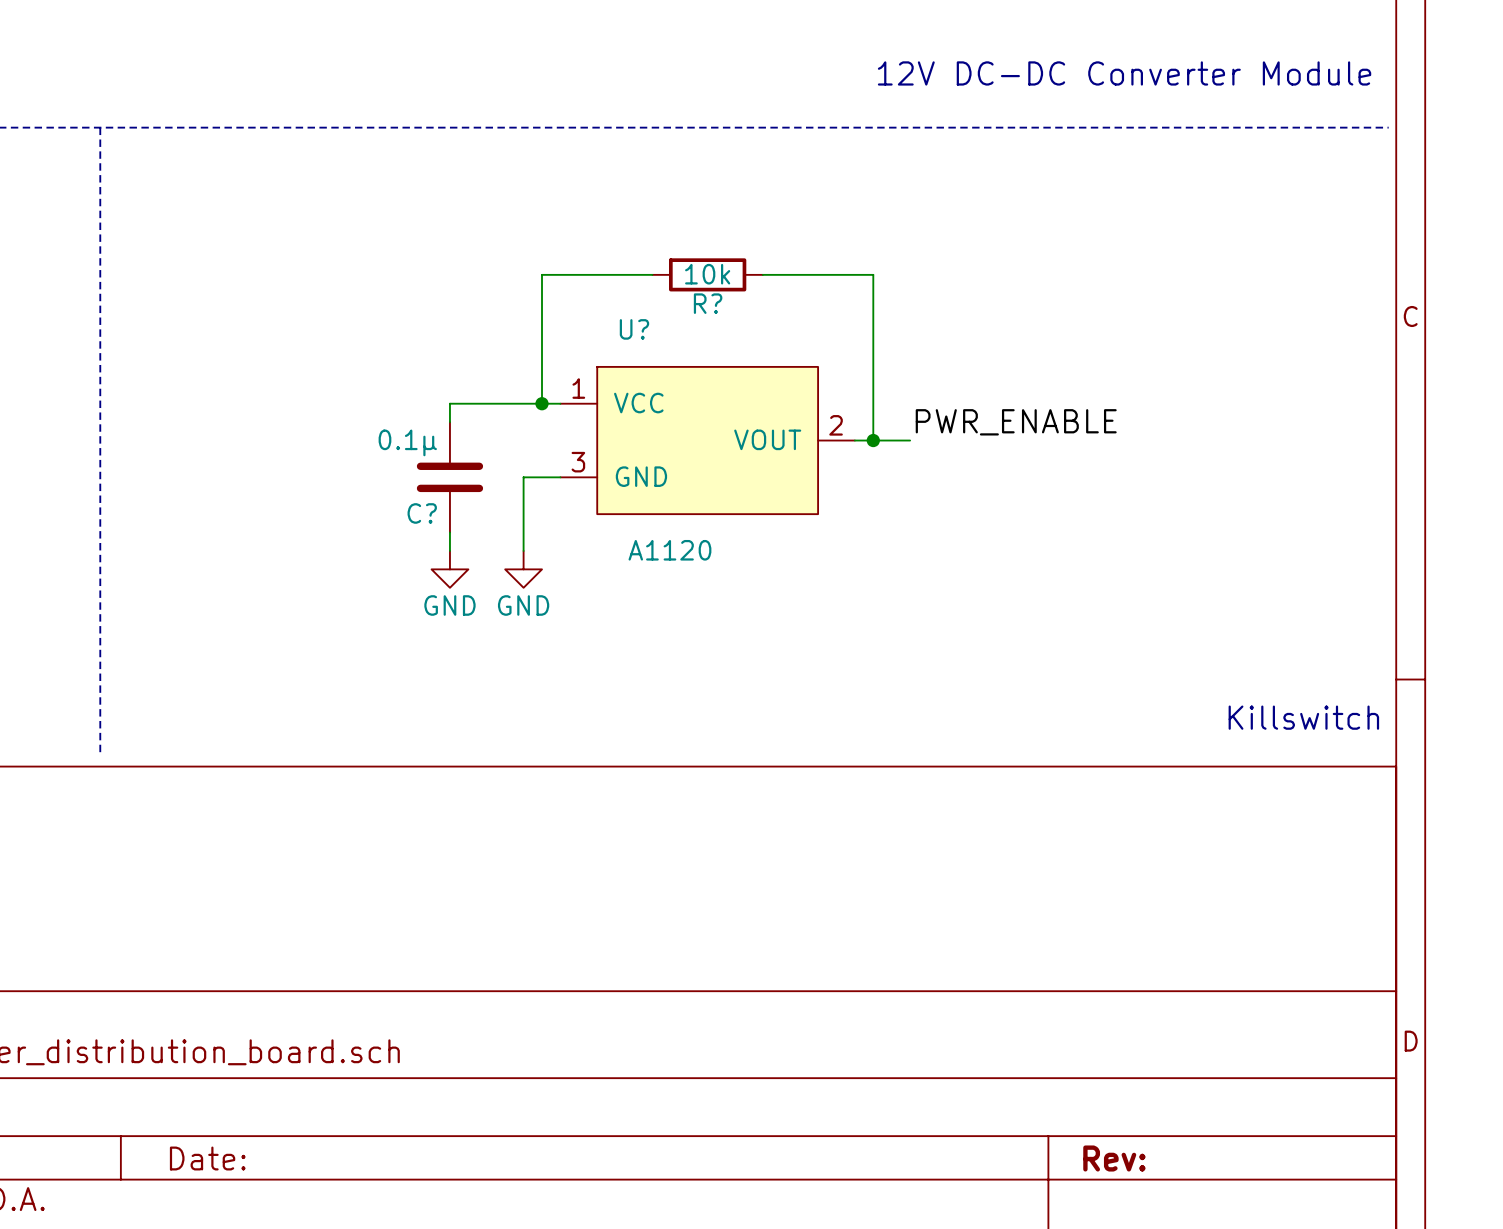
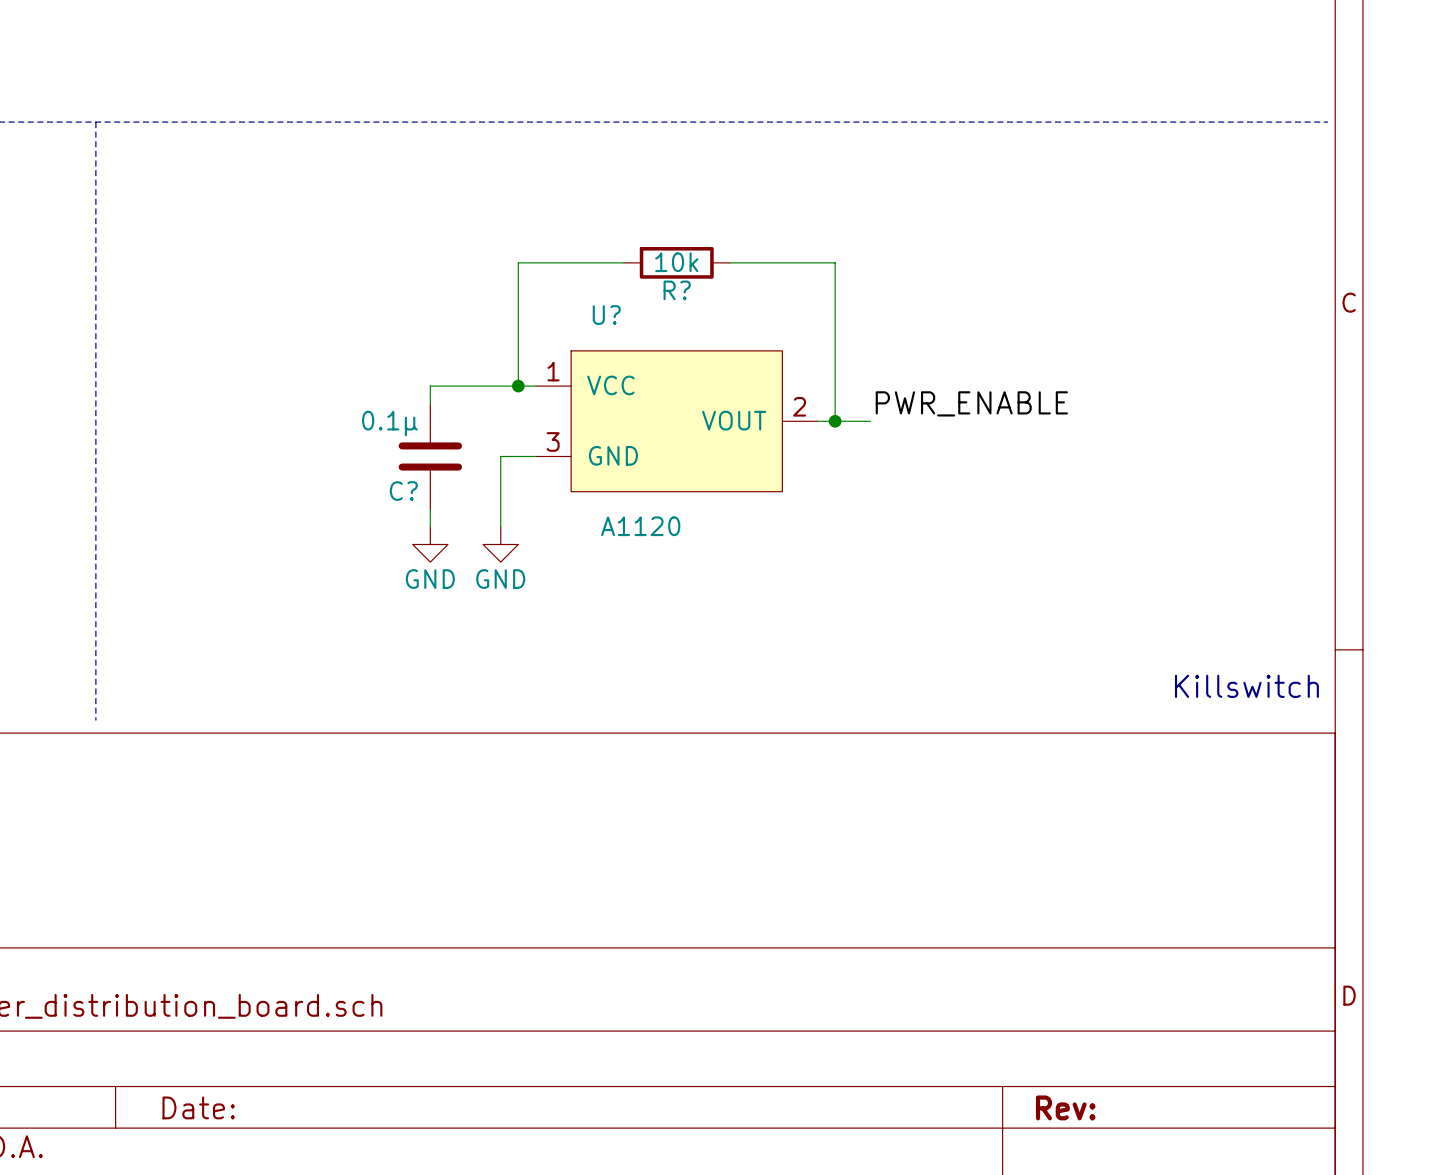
text: 12V DC-DC Converter Module (1124, 73) -> none

